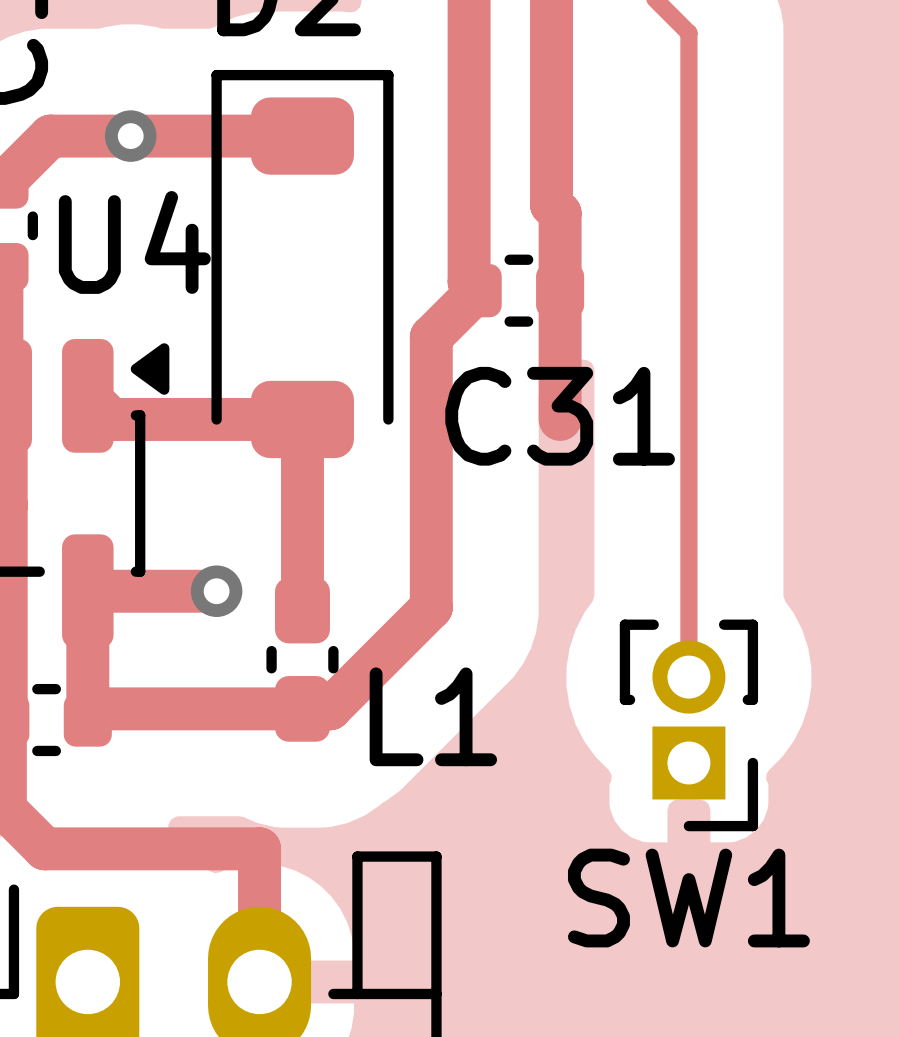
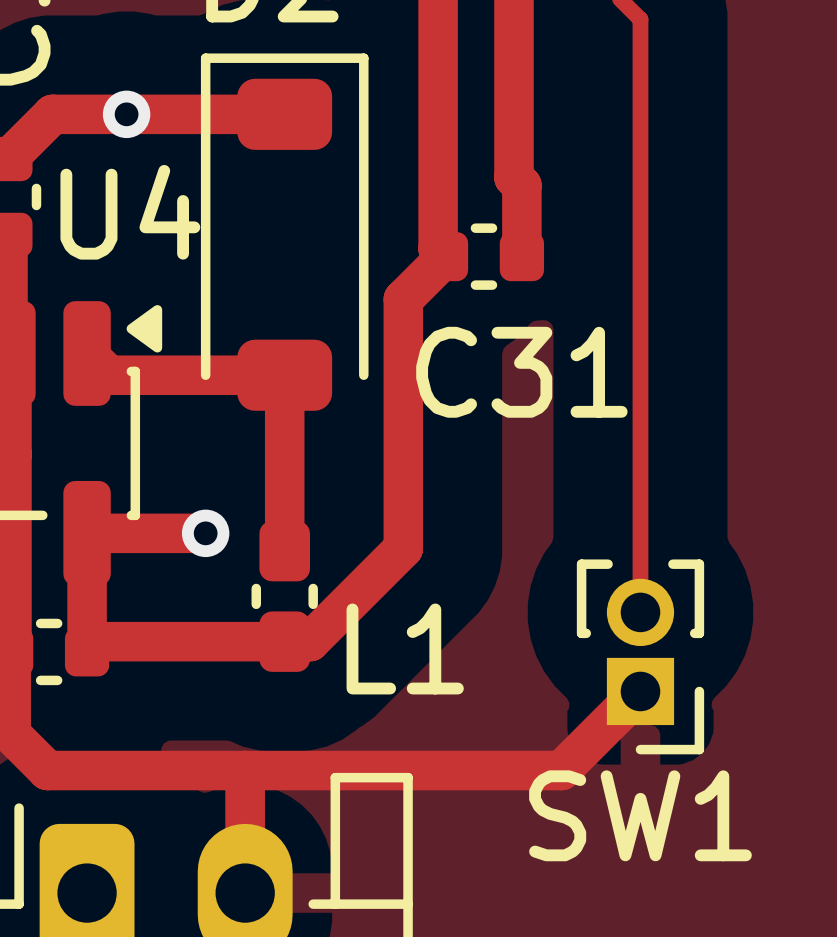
track: (560, 290) (560, 419) -> none
track: none -> (640, 691) (561, 770) (245, 770)

